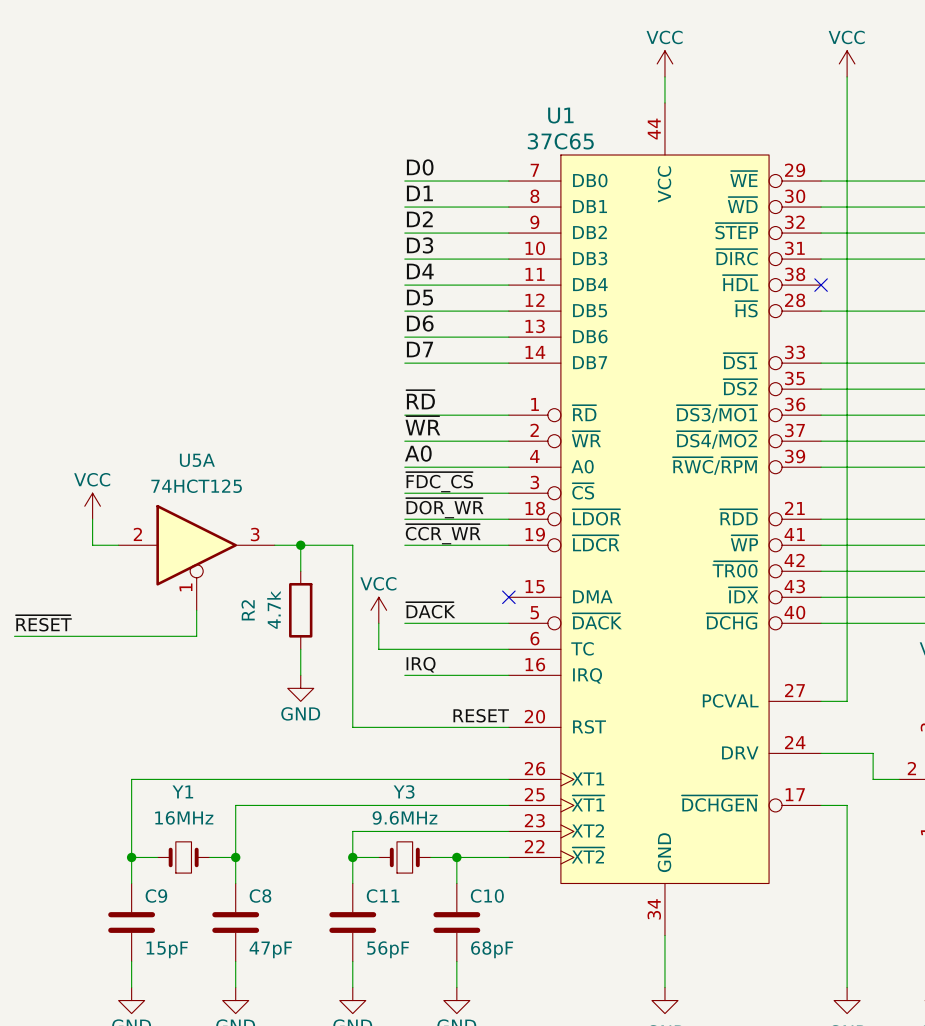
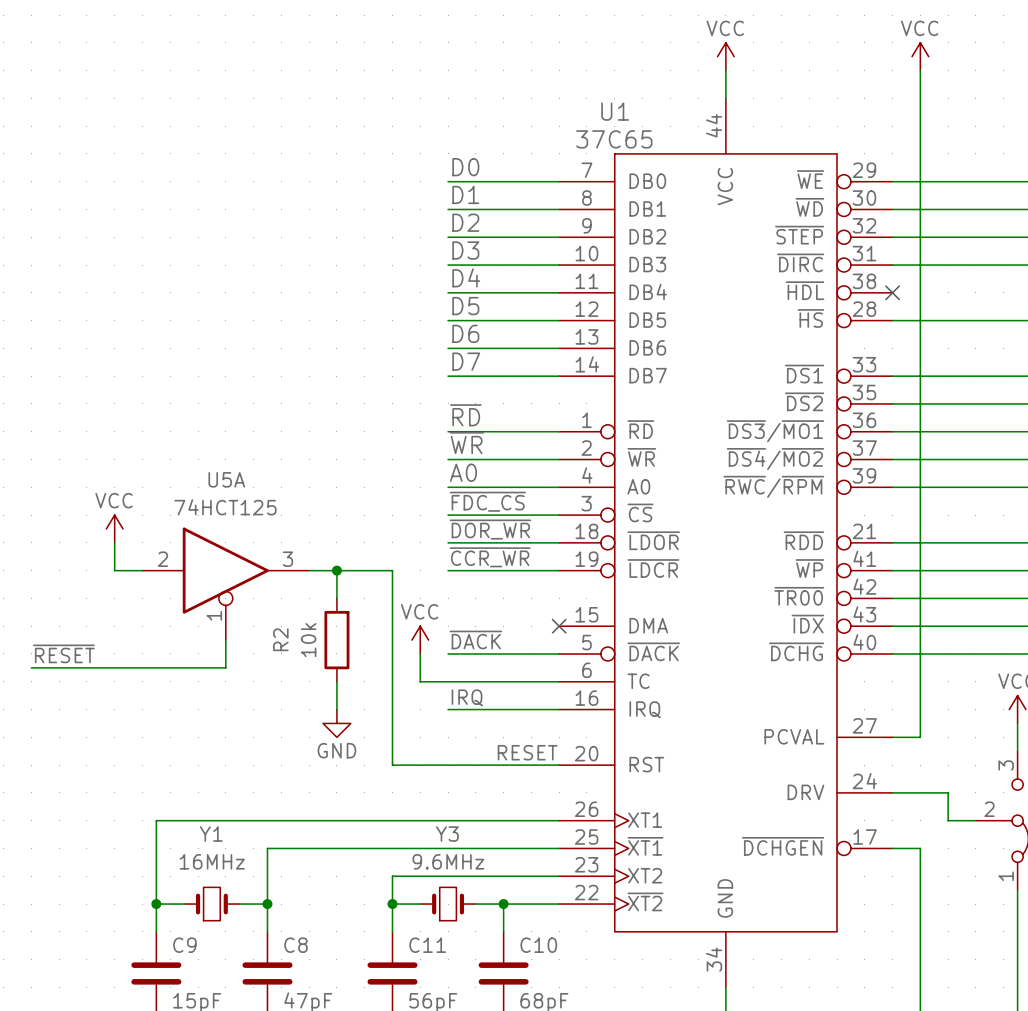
R2 value: 4.7k (273, 609) -> 10k (308, 640)

